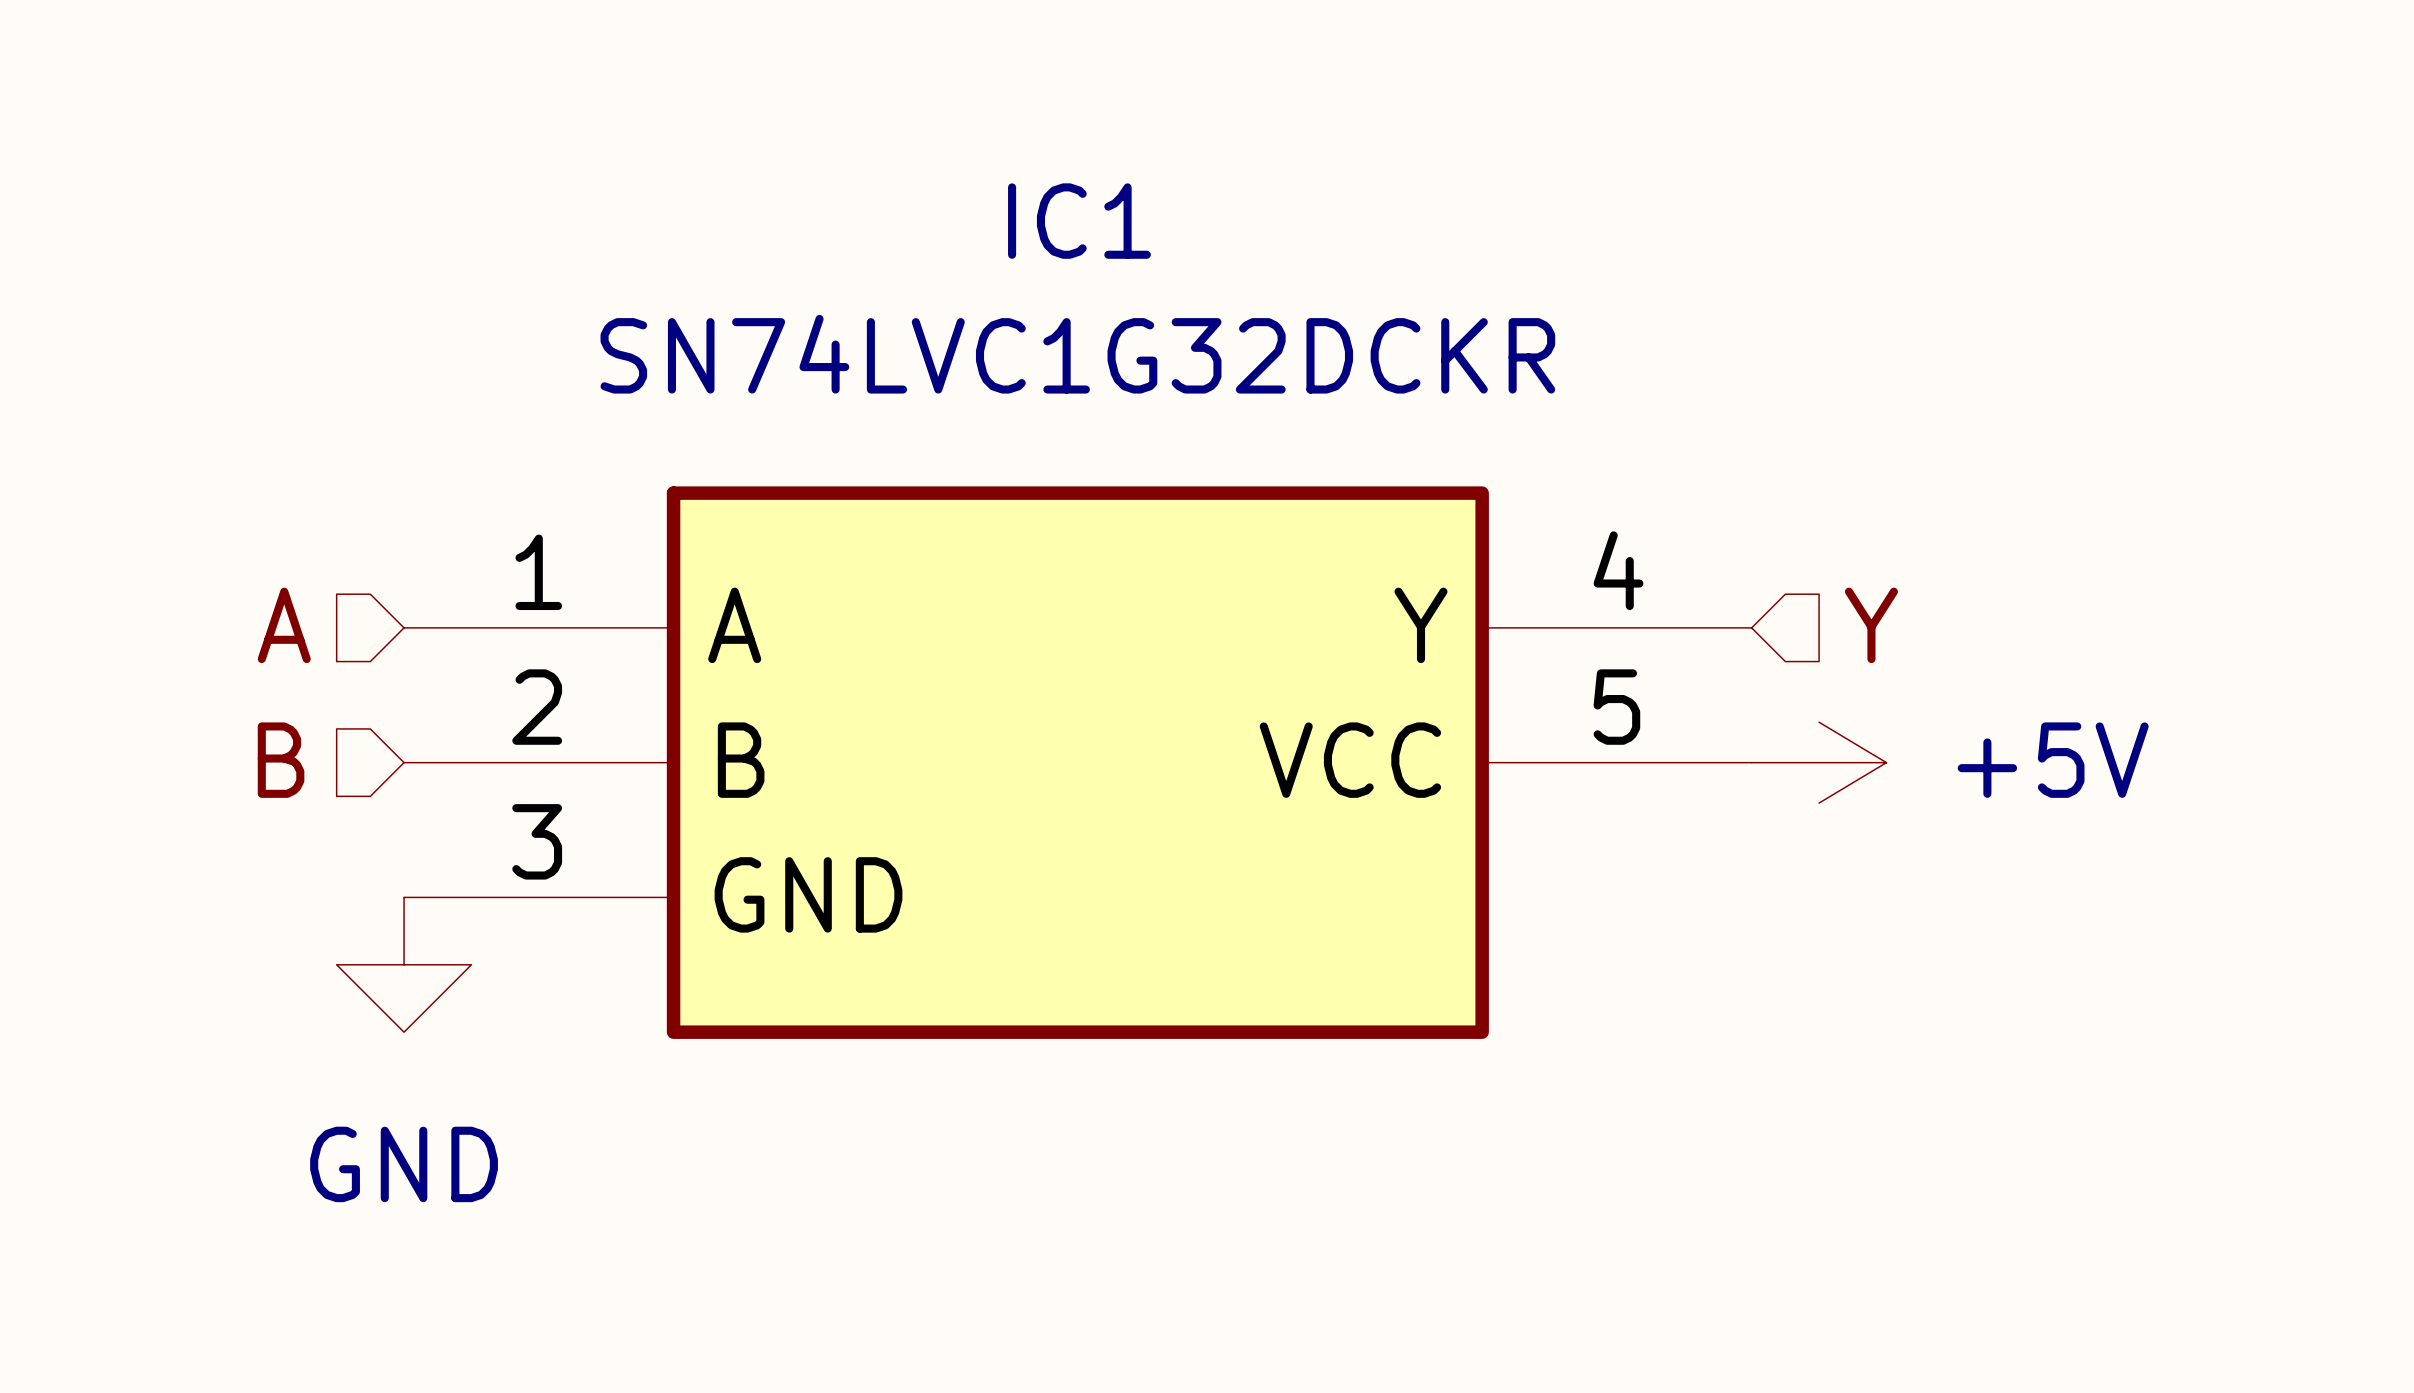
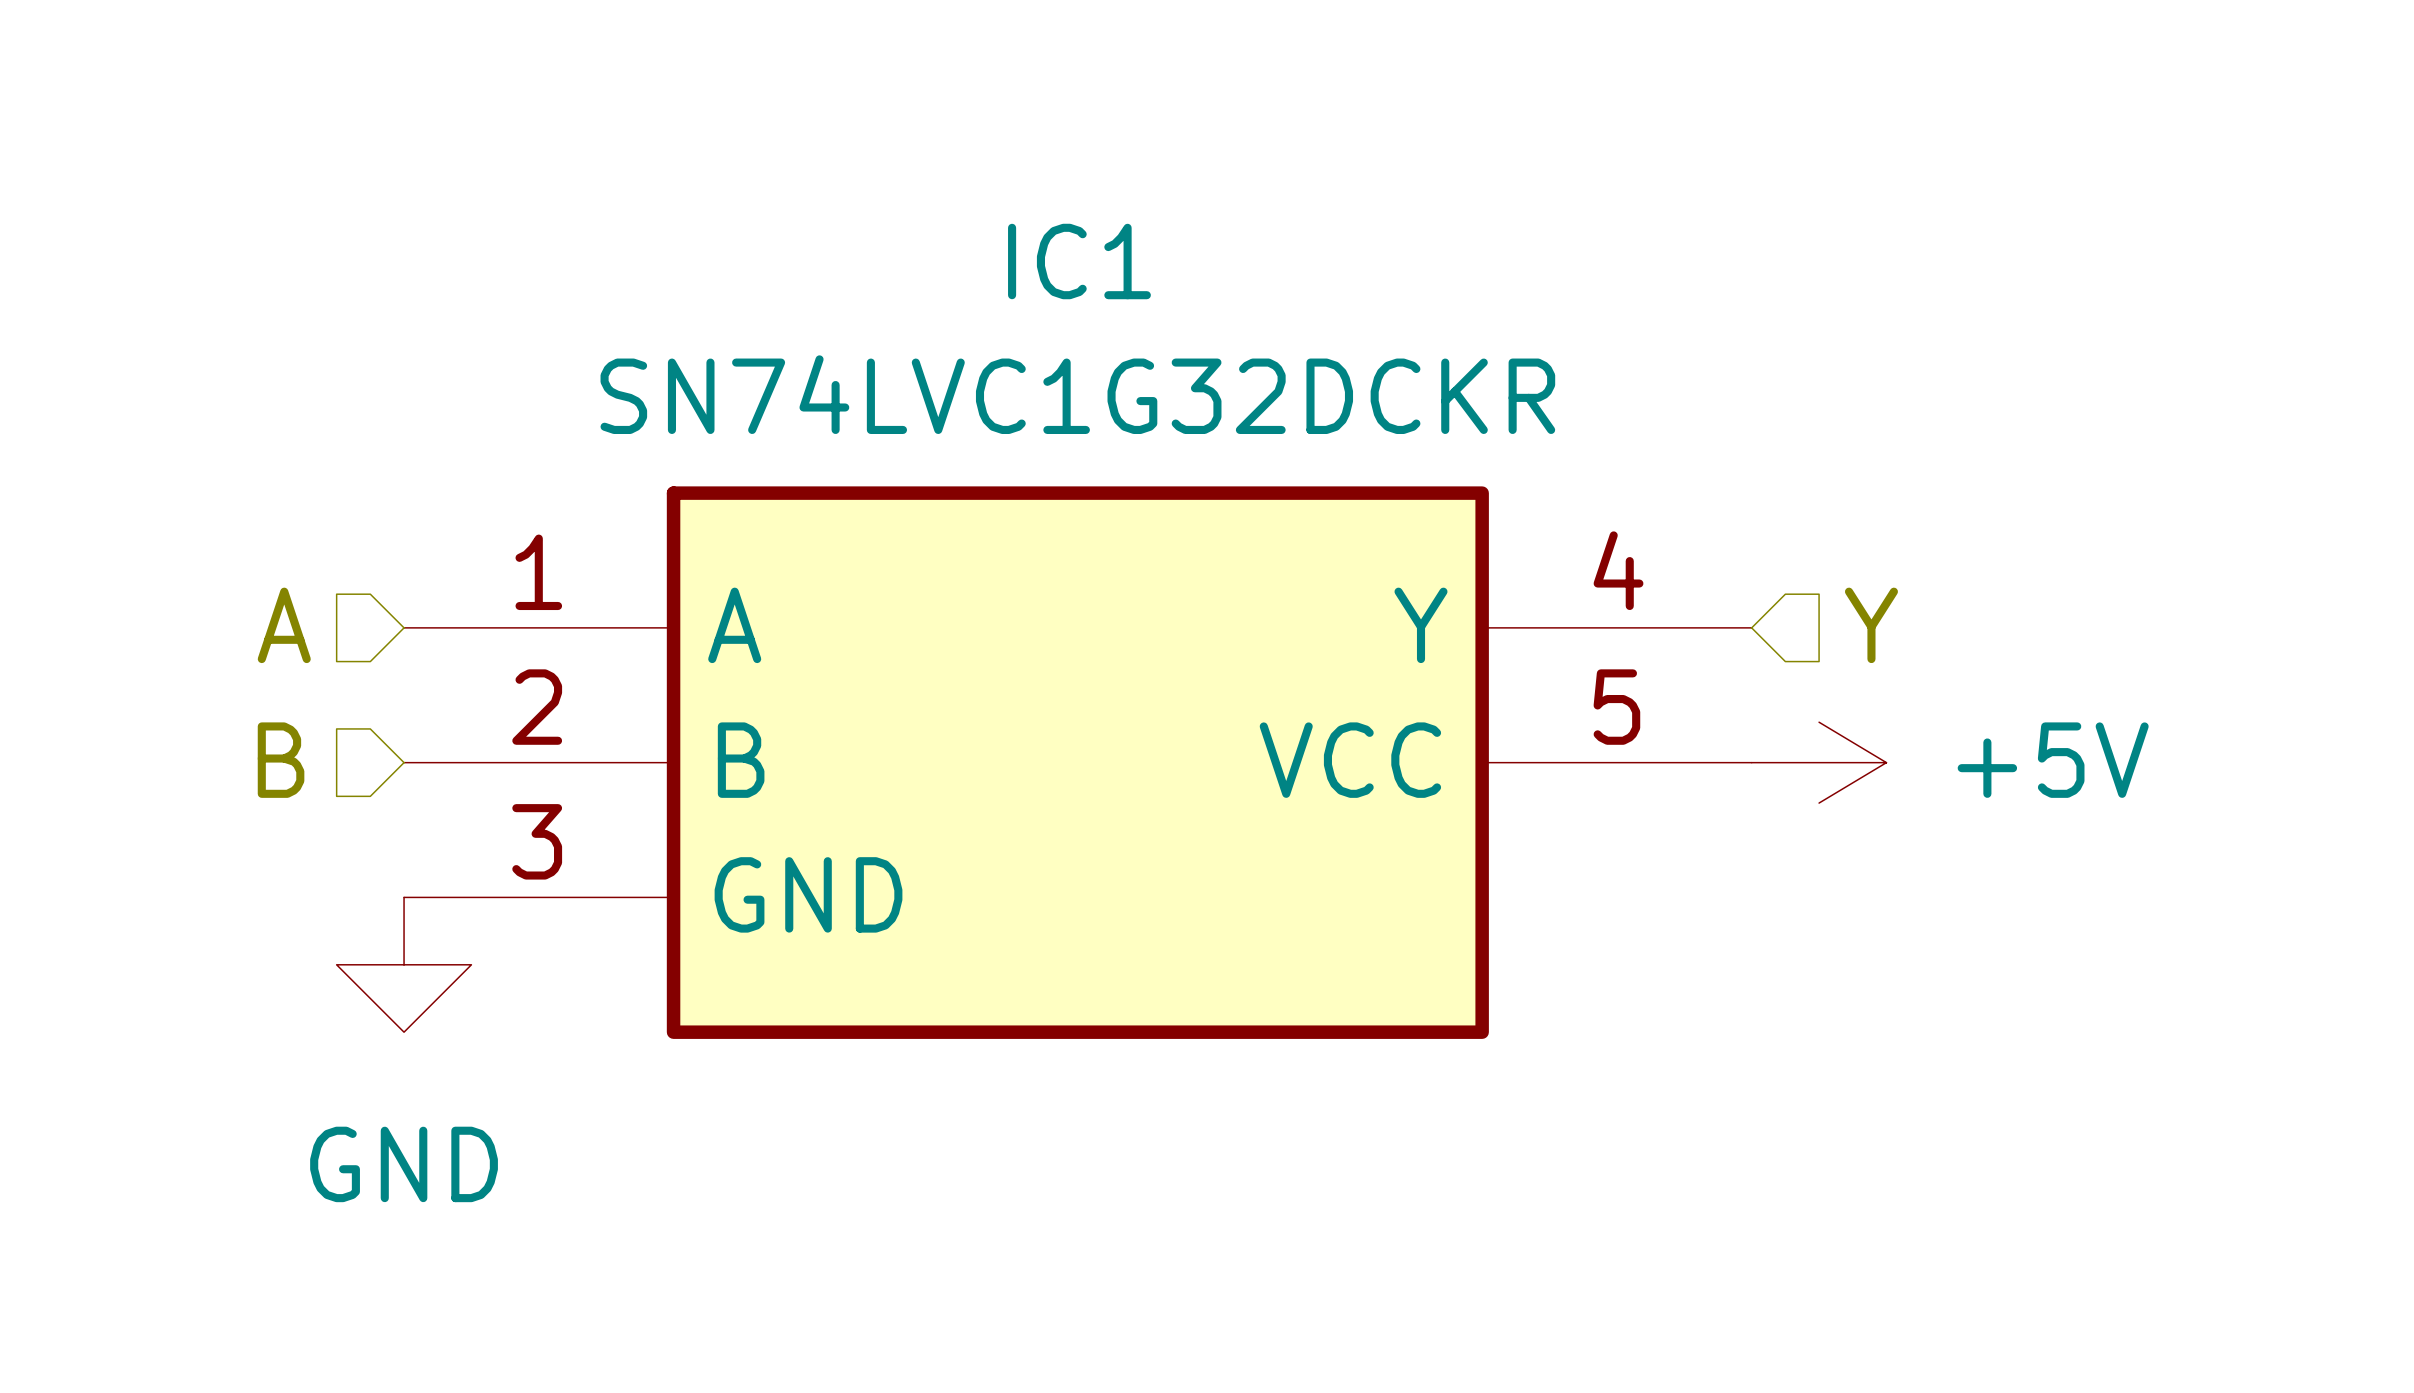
IC1 name position: IC1 (1079, 221) -> IC1 (1079, 261)
IC1 value position: SN74LVC1G32DCKR (1077, 354) -> SN74LVC1G32DCKR (1077, 394)

